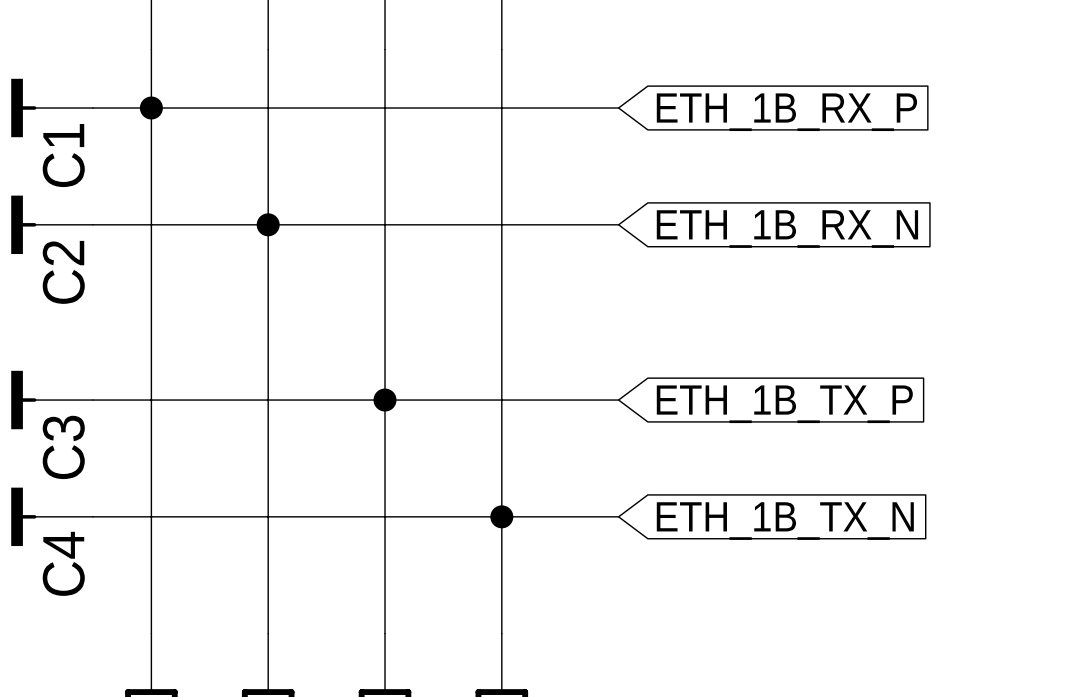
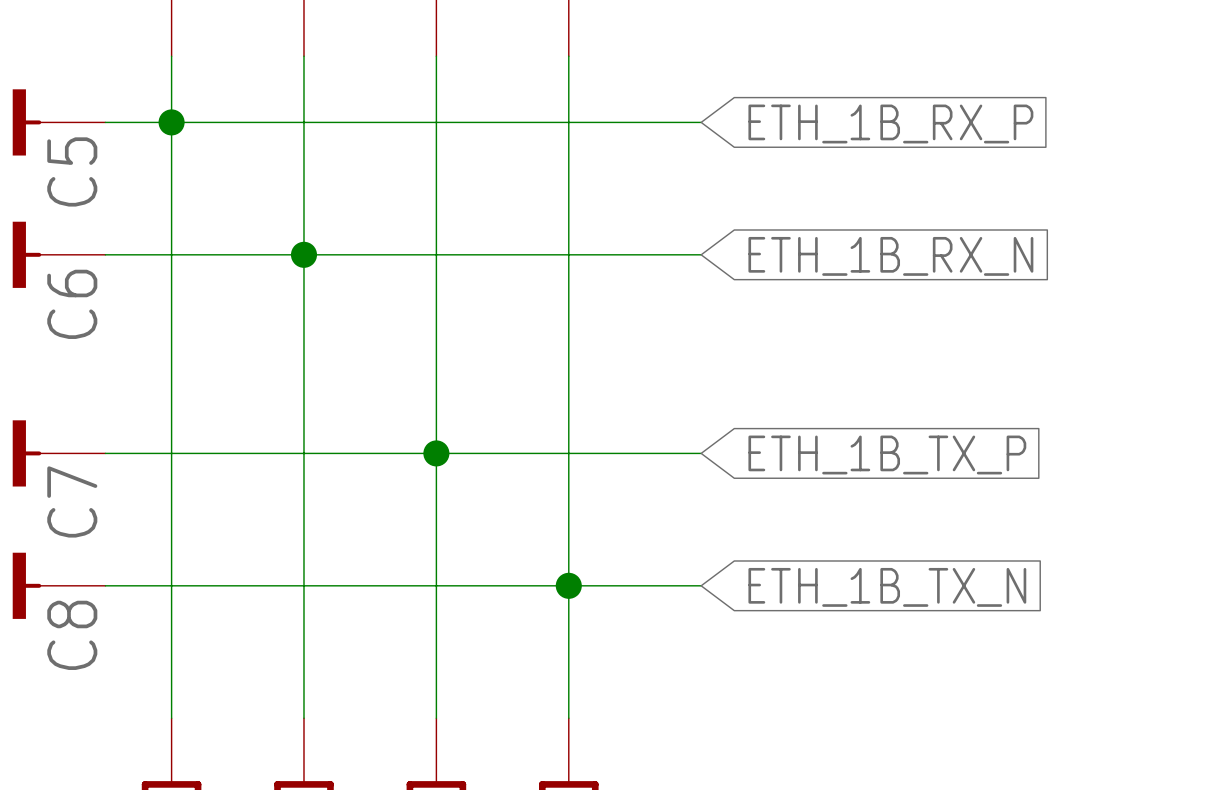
C1 name: C1 (63, 155) -> C5 (72, 171)
C2 name: C2 (63, 272) -> C6 (72, 304)
C3 name: C3 (63, 447) -> C7 (72, 501)
C4 name: C4 (63, 563) -> C8 (72, 635)

